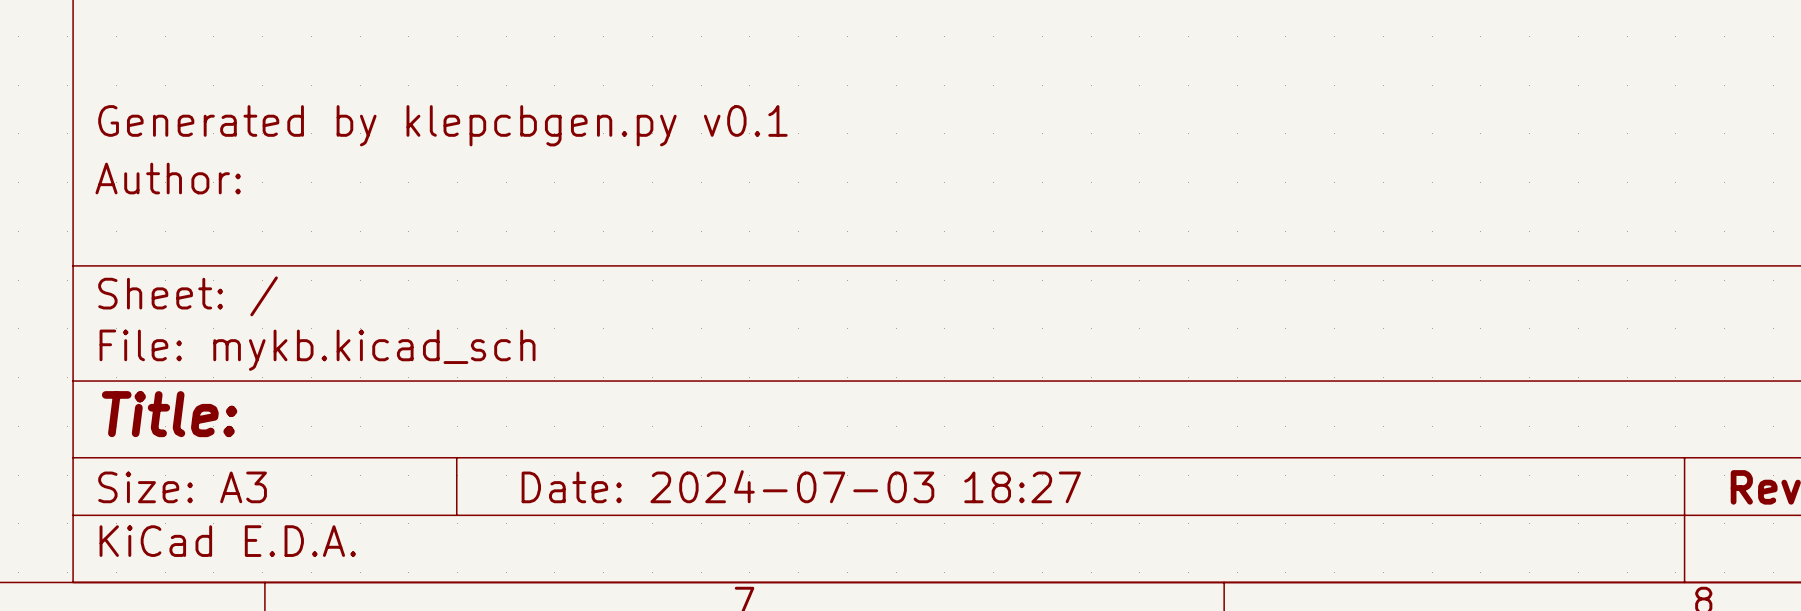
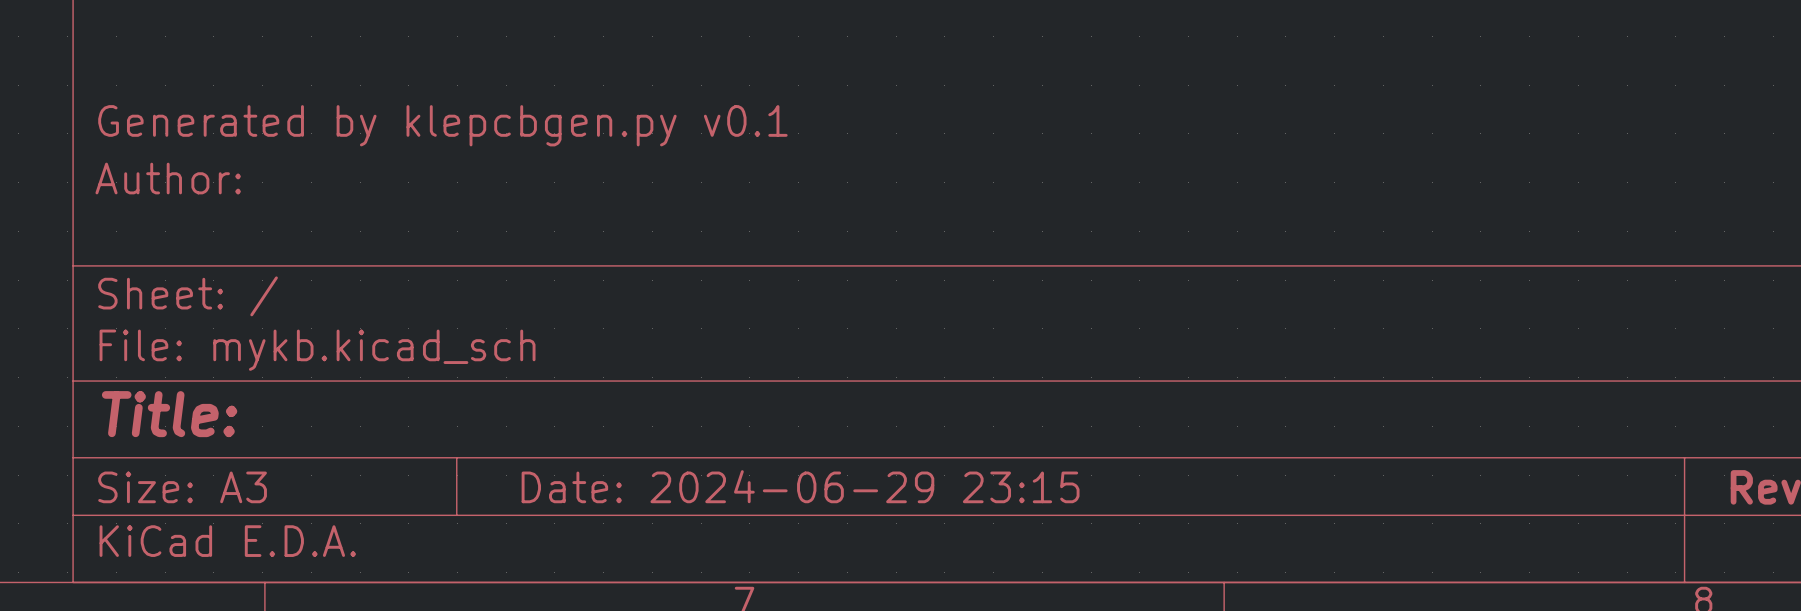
title block: Date: 2024-07-03 18:27 (801, 486) -> Date: 2024-06-29 23:15 (800, 486)

